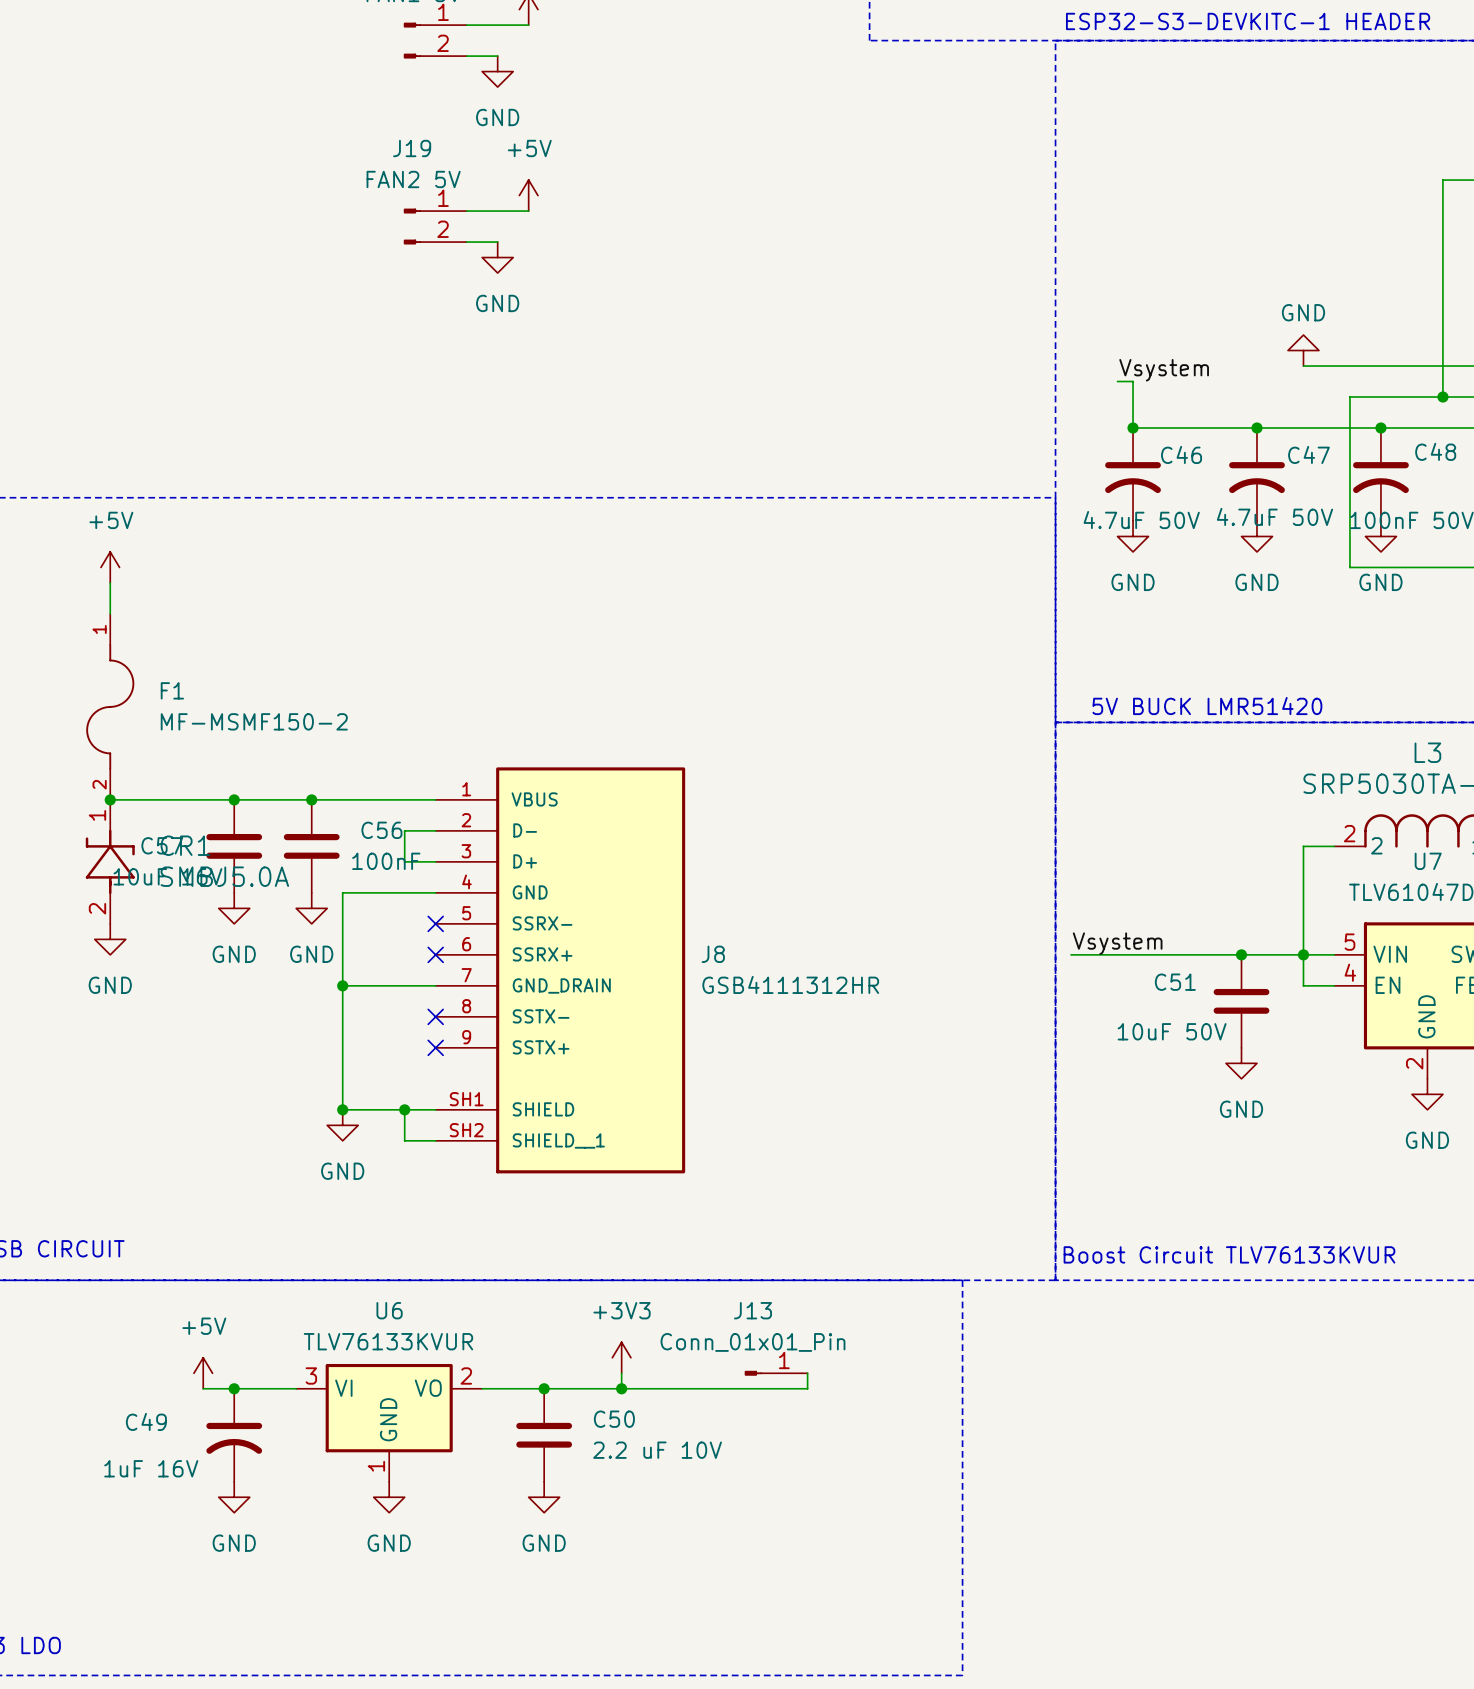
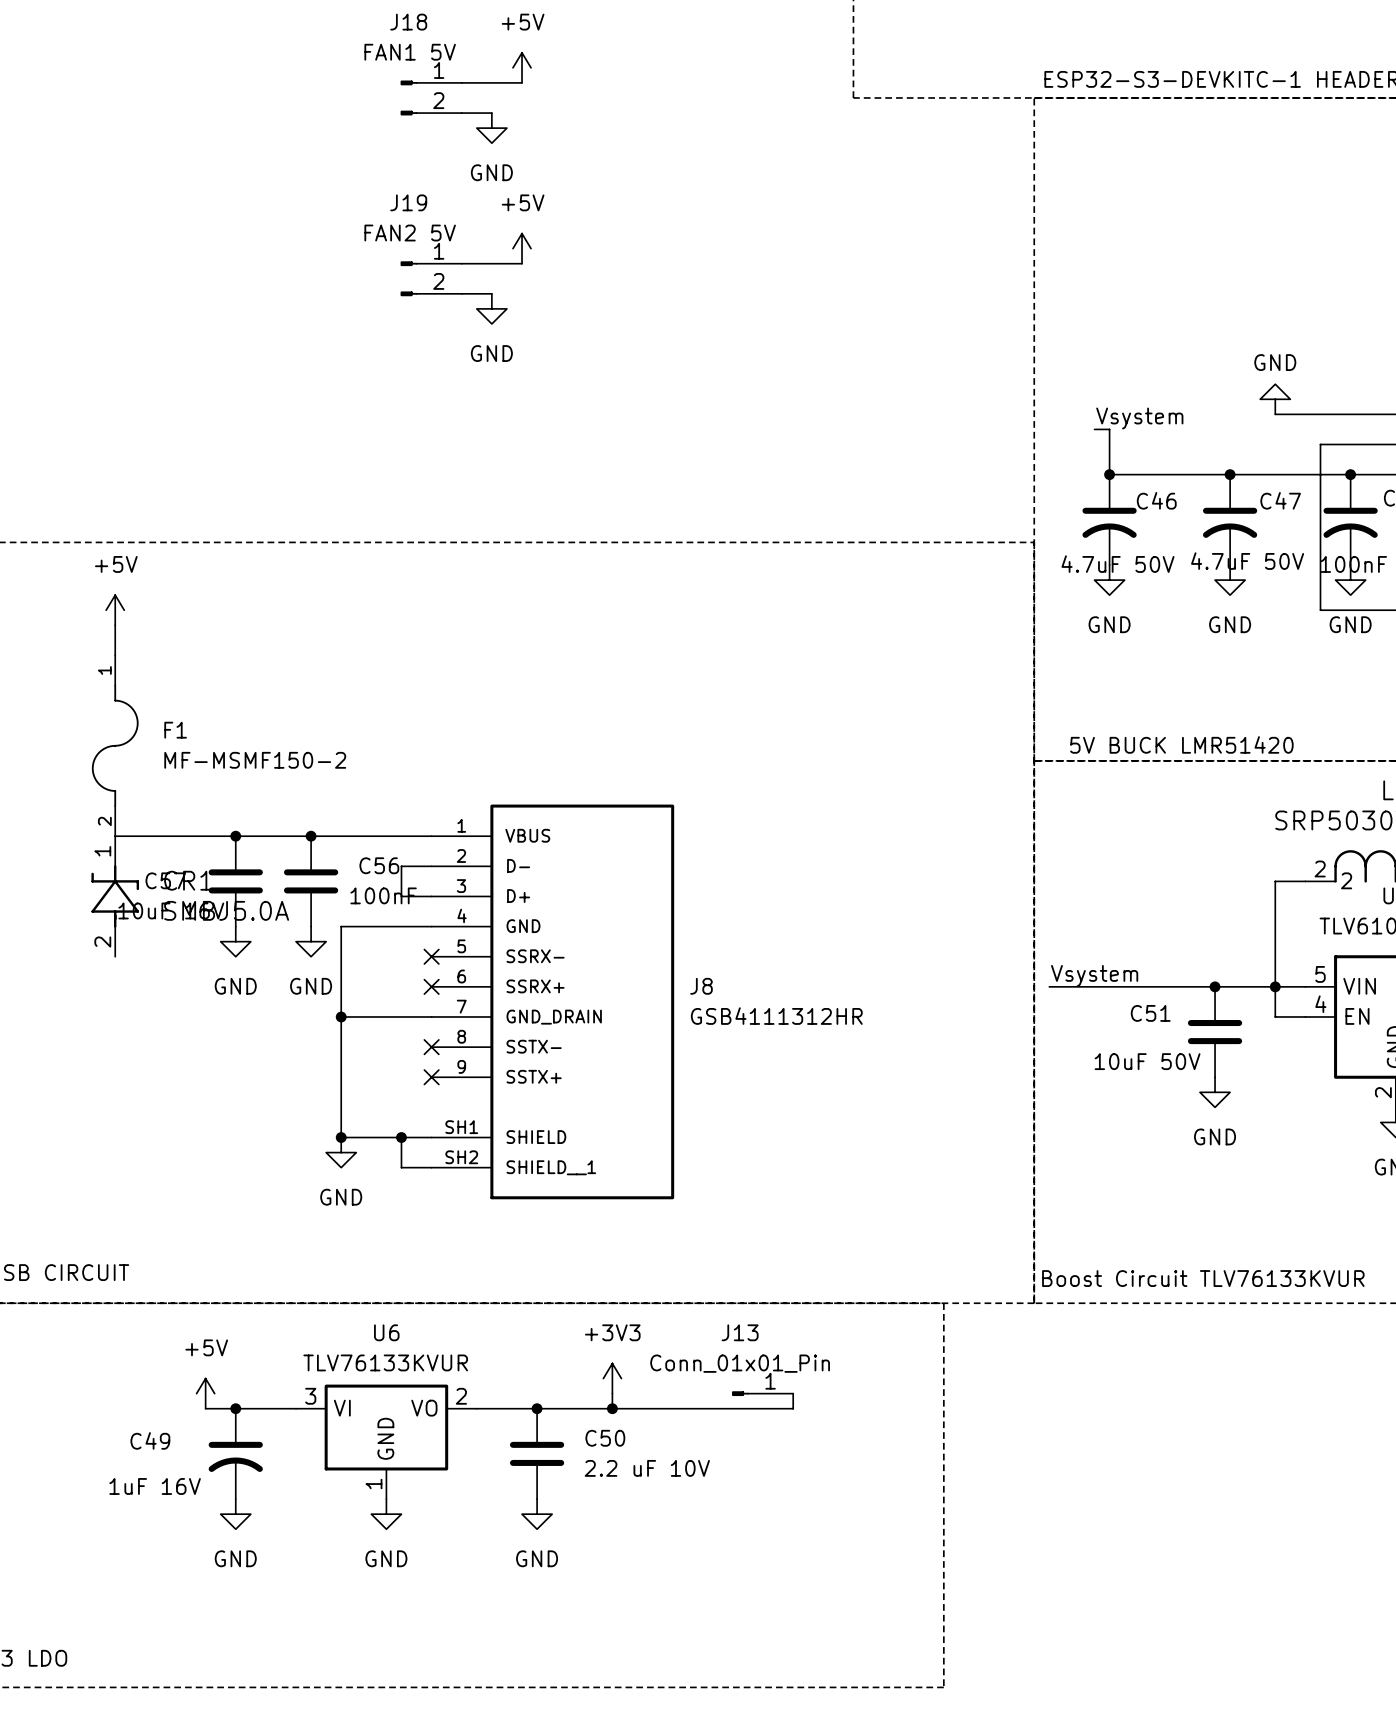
junction: (110, 799) -> none
power symbol: GND (110, 939) -> none

